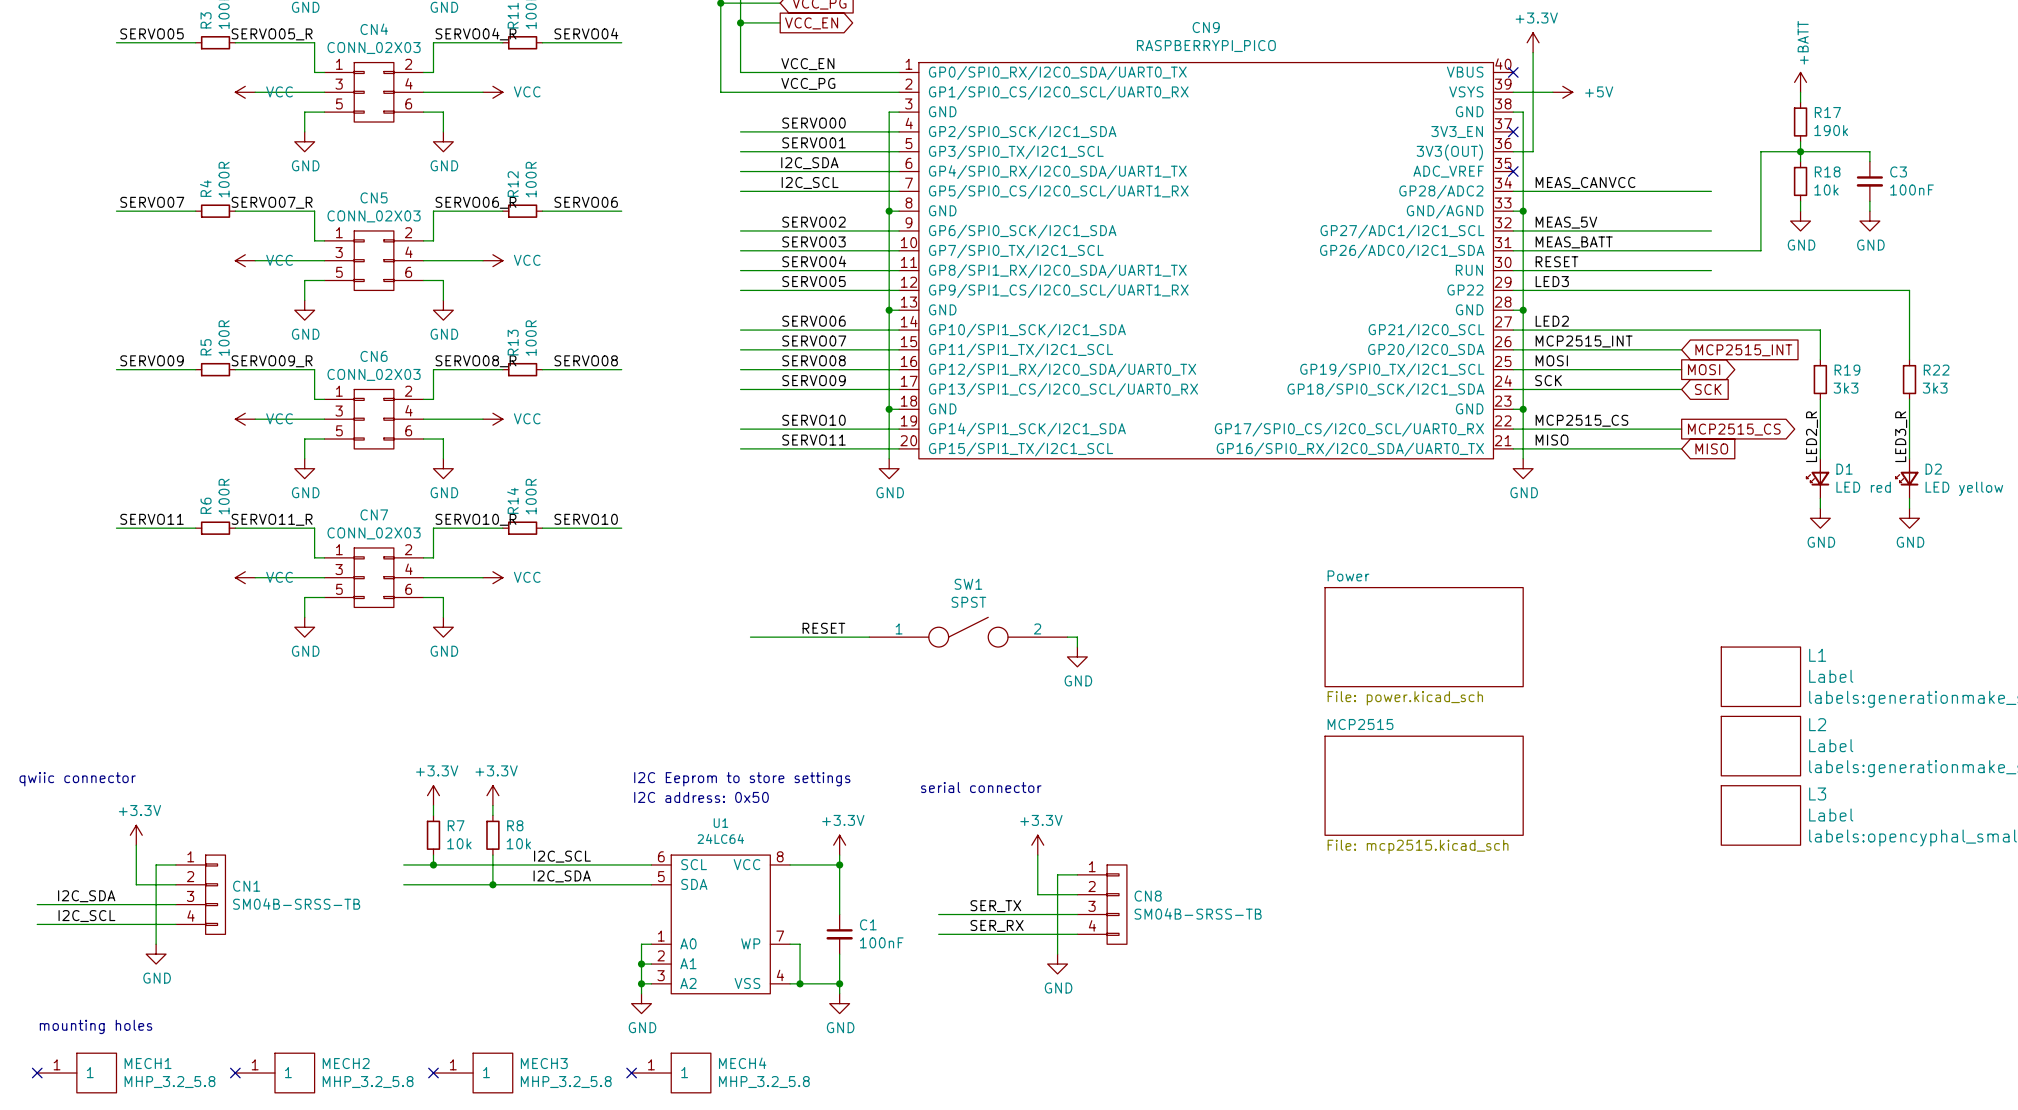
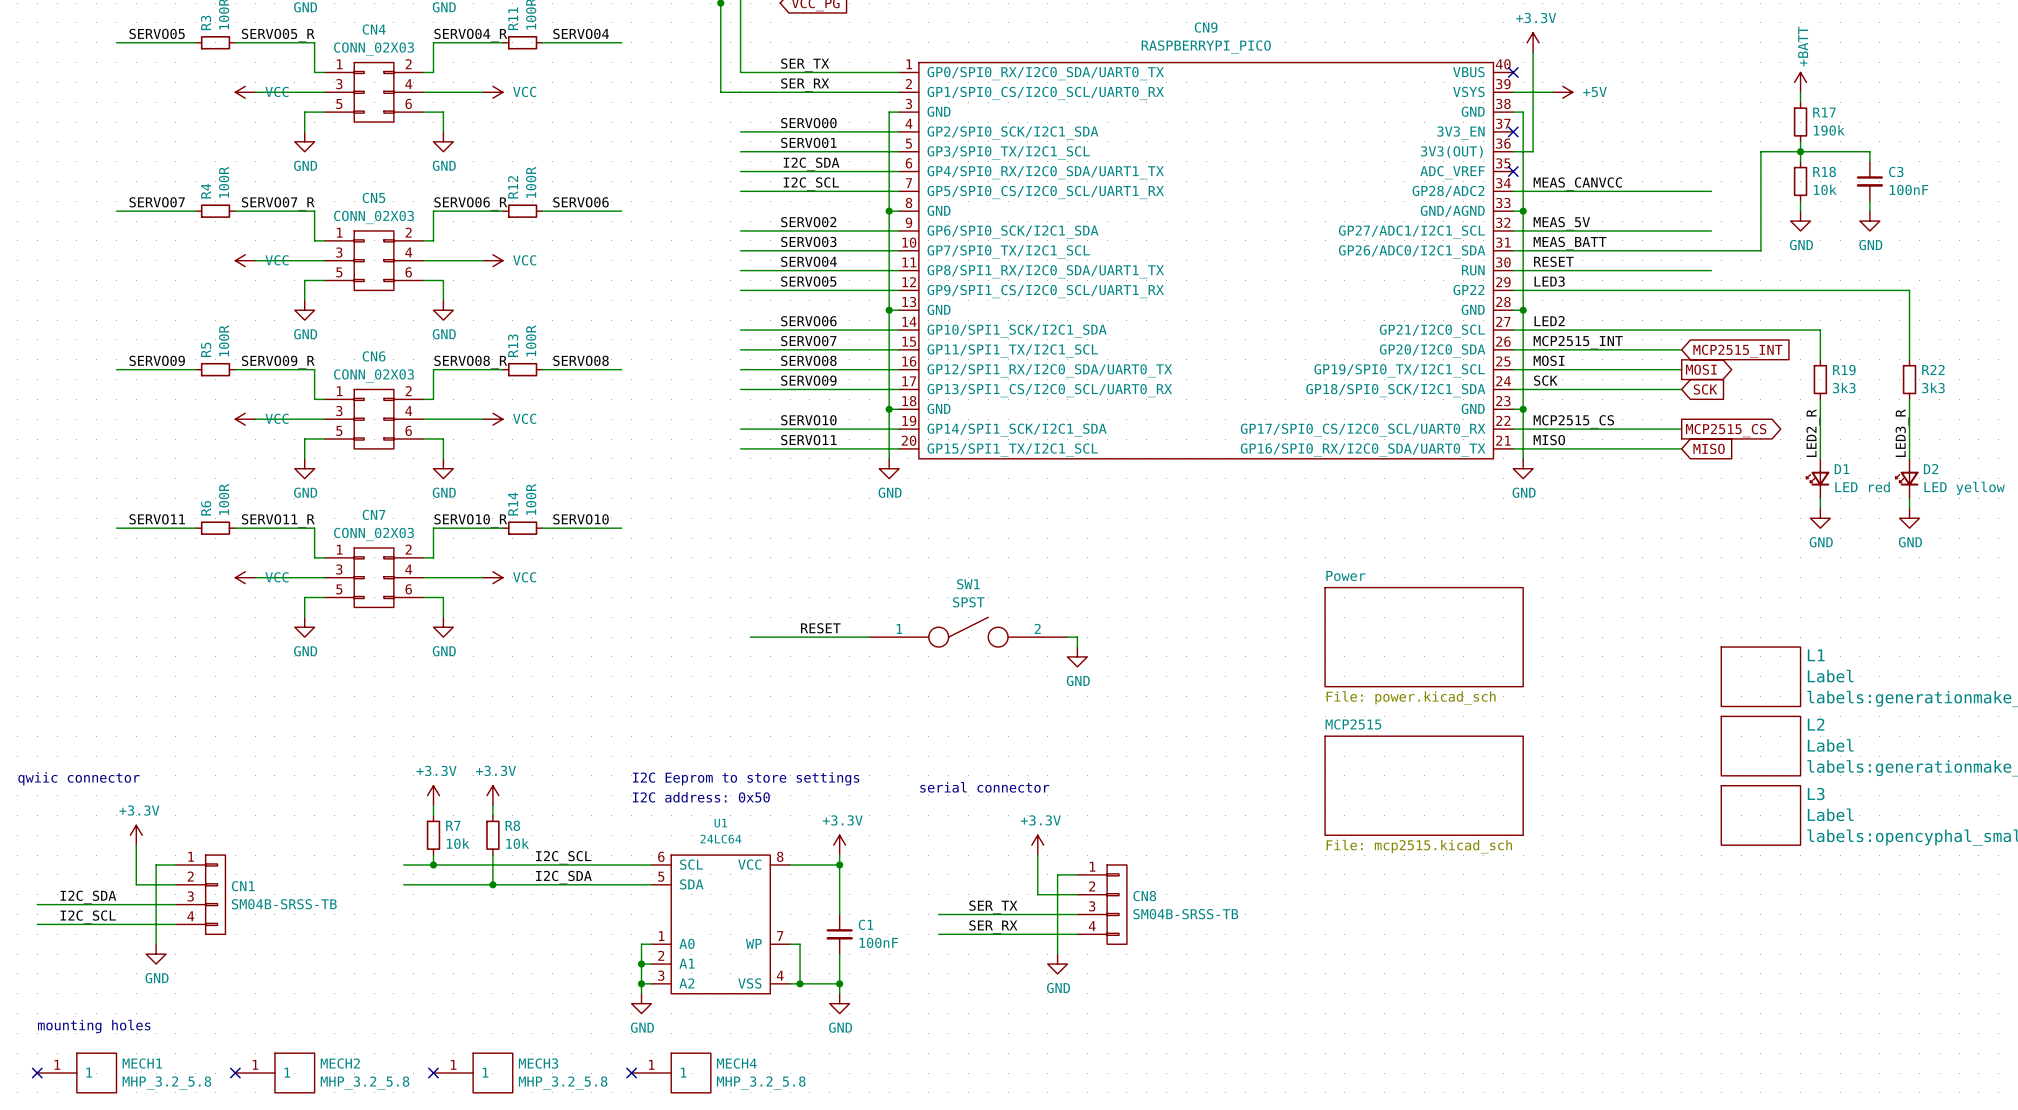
wire: (720, 3) (780, 3) -> none
wire: (740, 22) (780, 22) -> none
junction: (740, 22) -> none
global label: VCC_EN (811, 23) -> none
label: VCC_EN (807, 64) -> SER_TX (805, 65)
label: VCC_PG (808, 83) -> SER_RX (805, 84)

